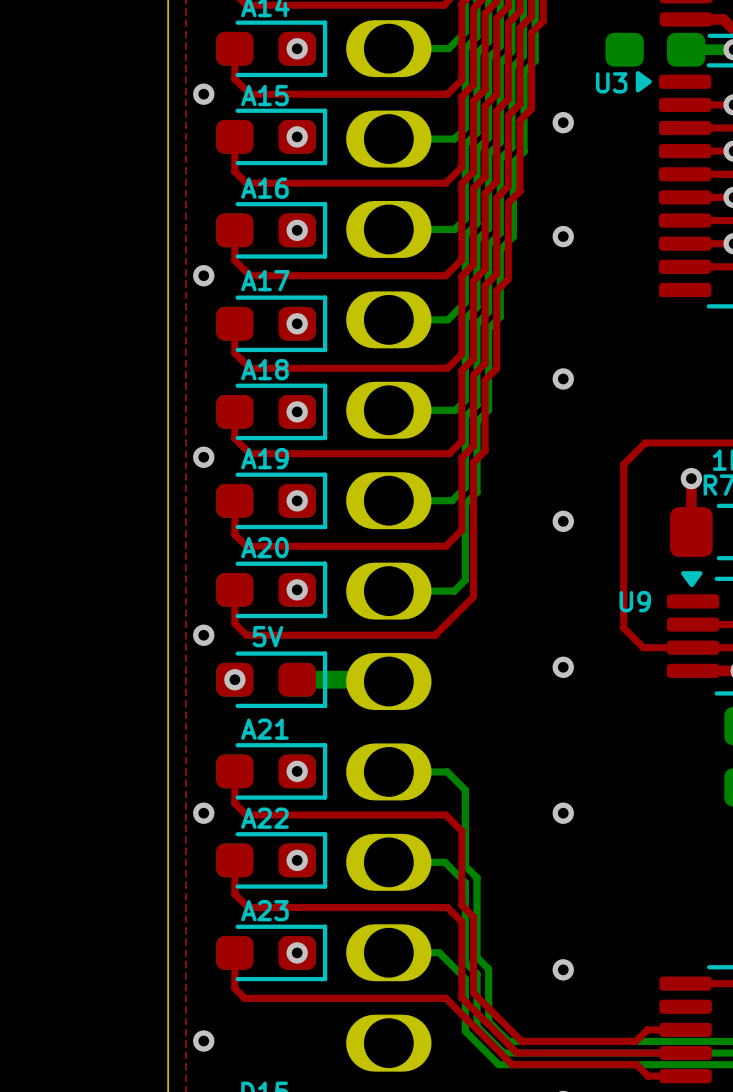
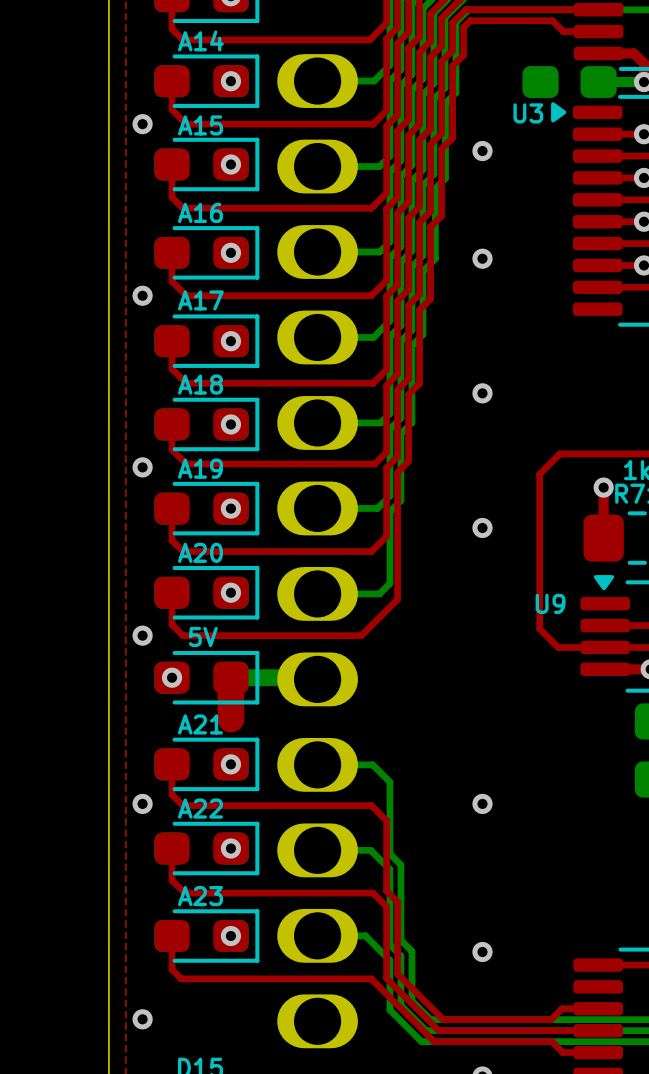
via: (563, 667) -> none
top track: none -> (230, 677) (230, 718)

